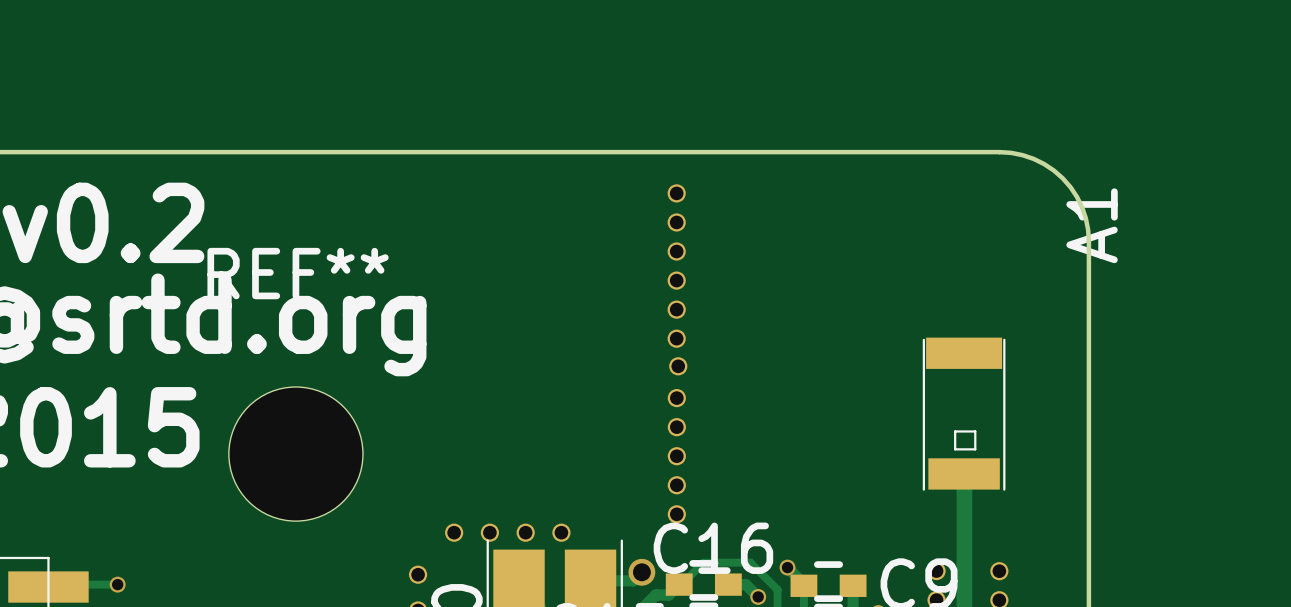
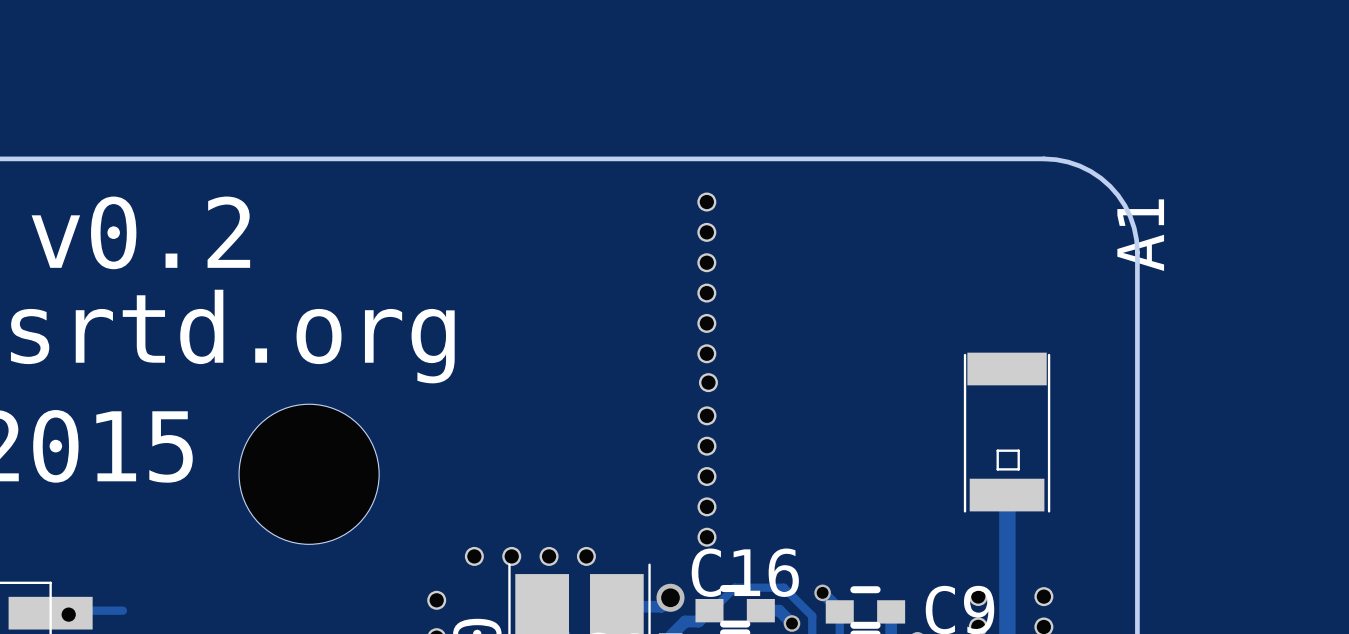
REF** name: REF** (298, 273) -> none
via: (117, 584) -> none
part: none -> (68, 614)

